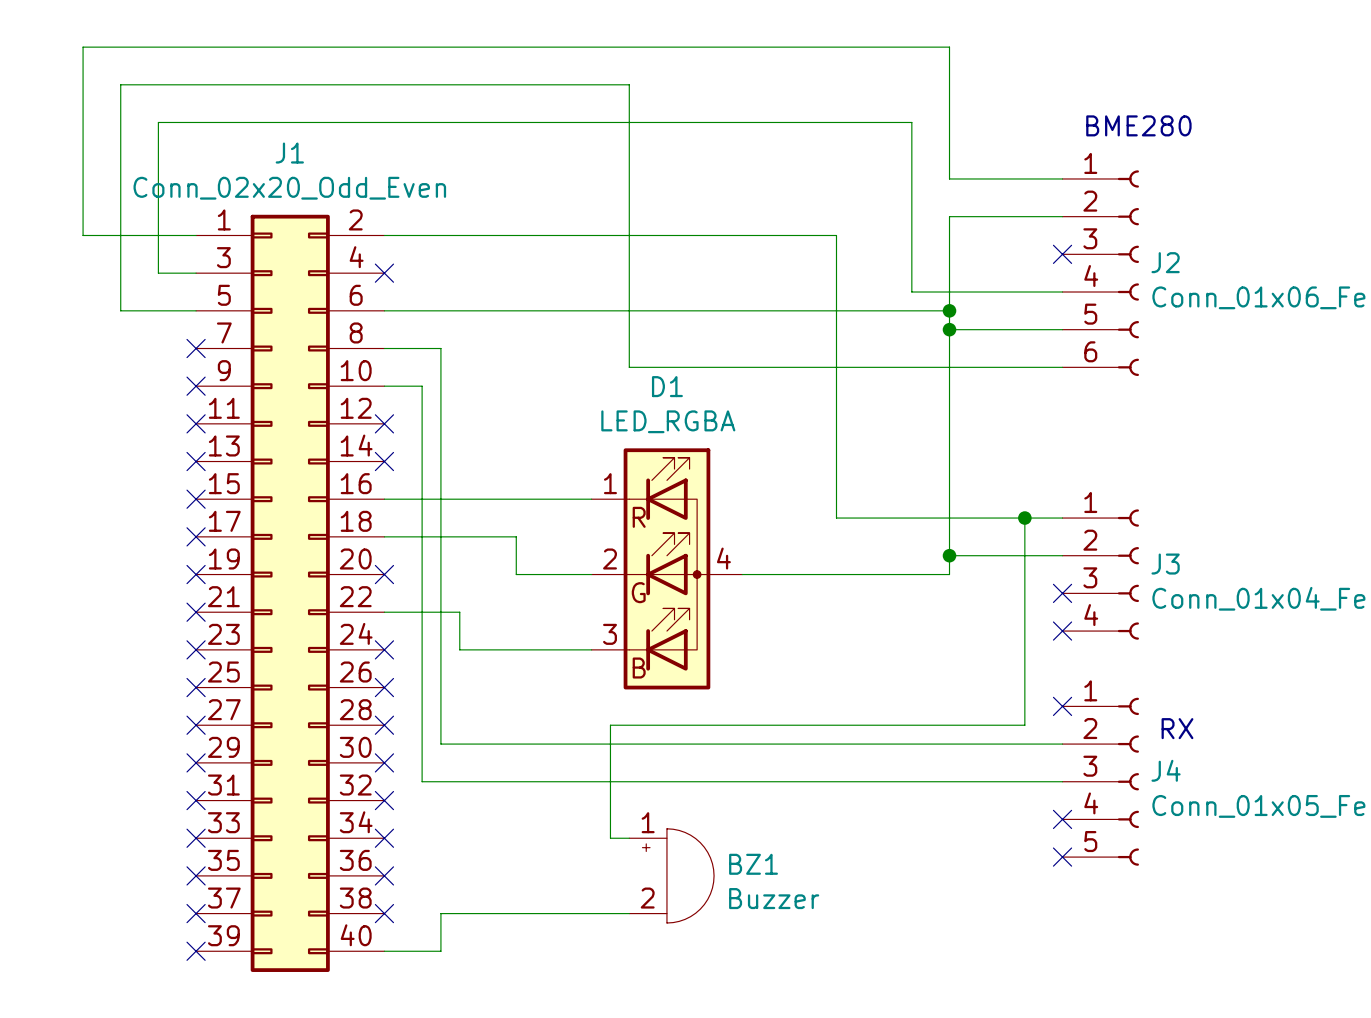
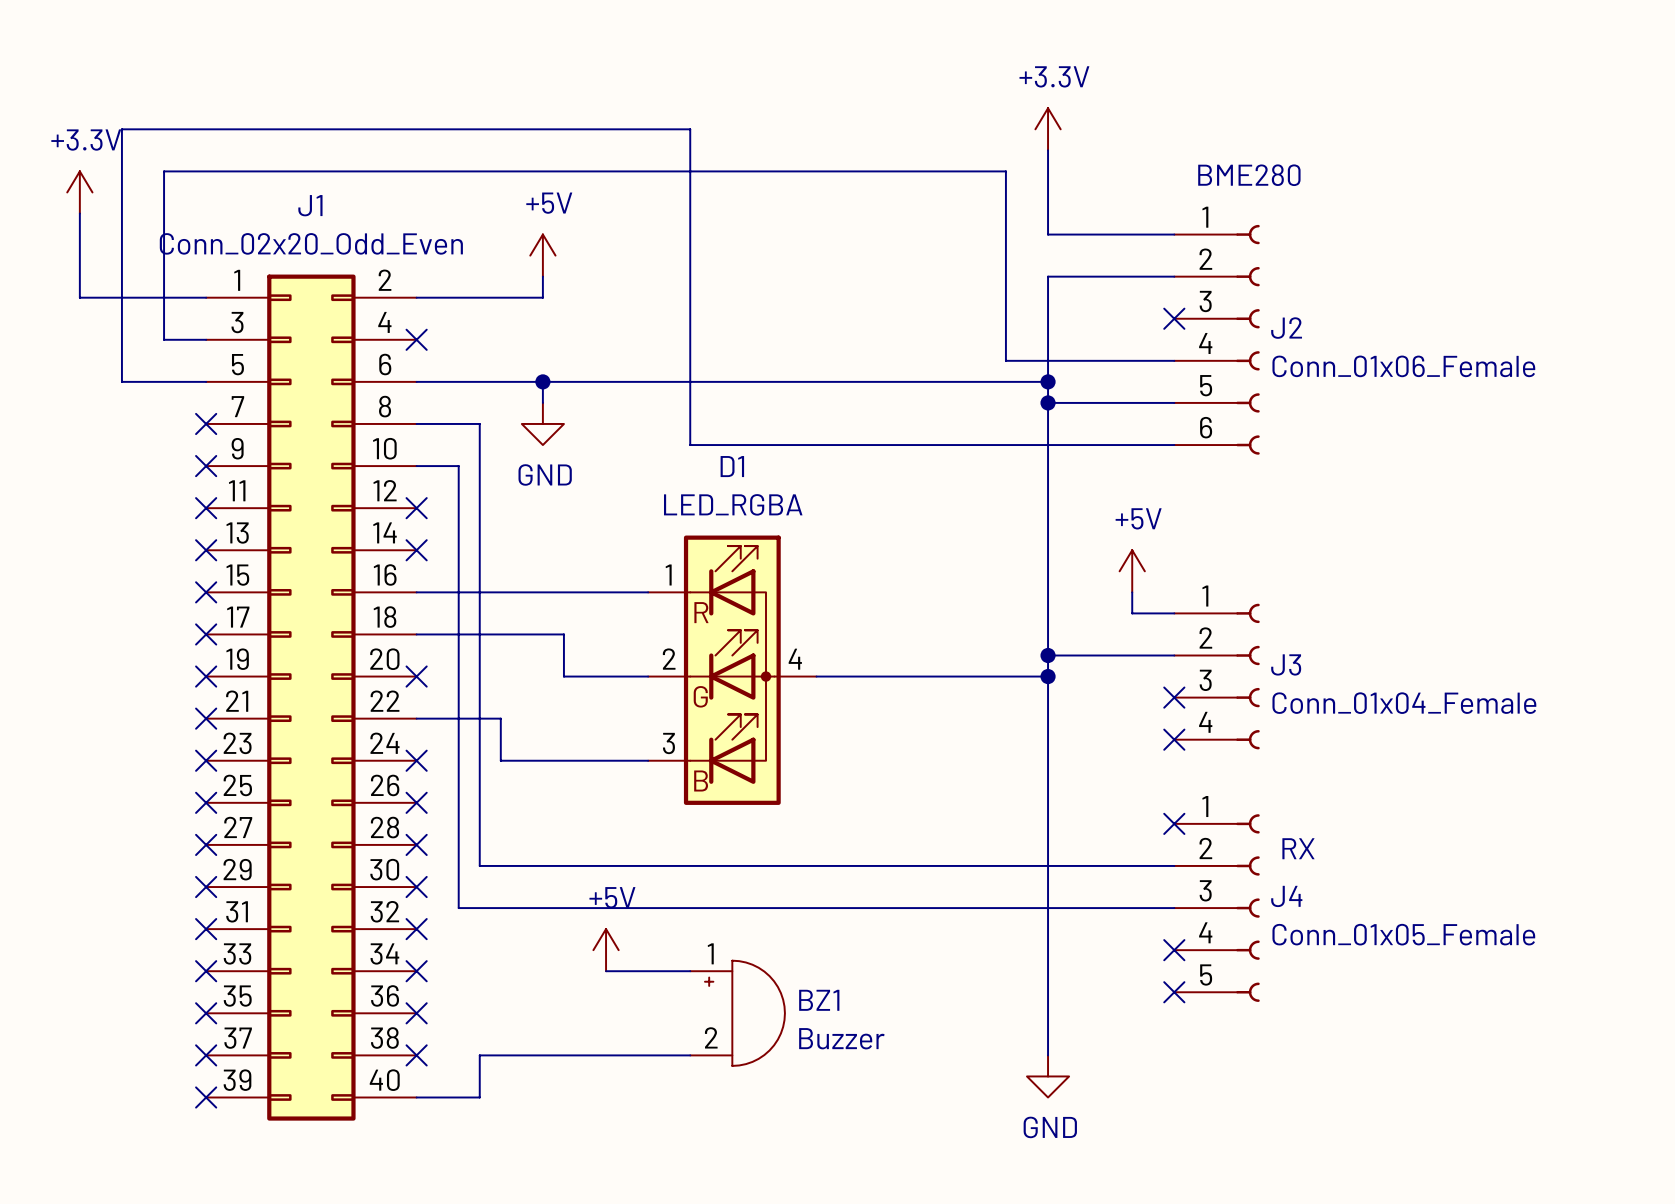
power symbol: none -> +3.3V (1048, 129)
wire: (949, 103) (949, 47) (83, 47) (83, 160) -> none
power symbol: none -> +3.3V (79, 192)
power symbol: none -> +5V (542, 255)
wire: none -> (542, 276) (542, 297)
wire: (497, 235) (836, 235) (836, 518) (1024, 518) (1024, 725) (610, 725) (610, 838) -> (606, 971) (669, 971)
wire: none -> (542, 381) (542, 402)
junction: none -> (542, 381)
power symbol: none -> GND (542, 423)
power symbol: none -> +5V (1132, 571)
wire: none -> (1132, 592) (1132, 613)
junction: (1024, 518) -> none
wire: none -> (1048, 676) (1048, 1055)
junction: none -> (1048, 676)
power symbol: none -> +5V (606, 950)
power symbol: none -> GND (1048, 1076)

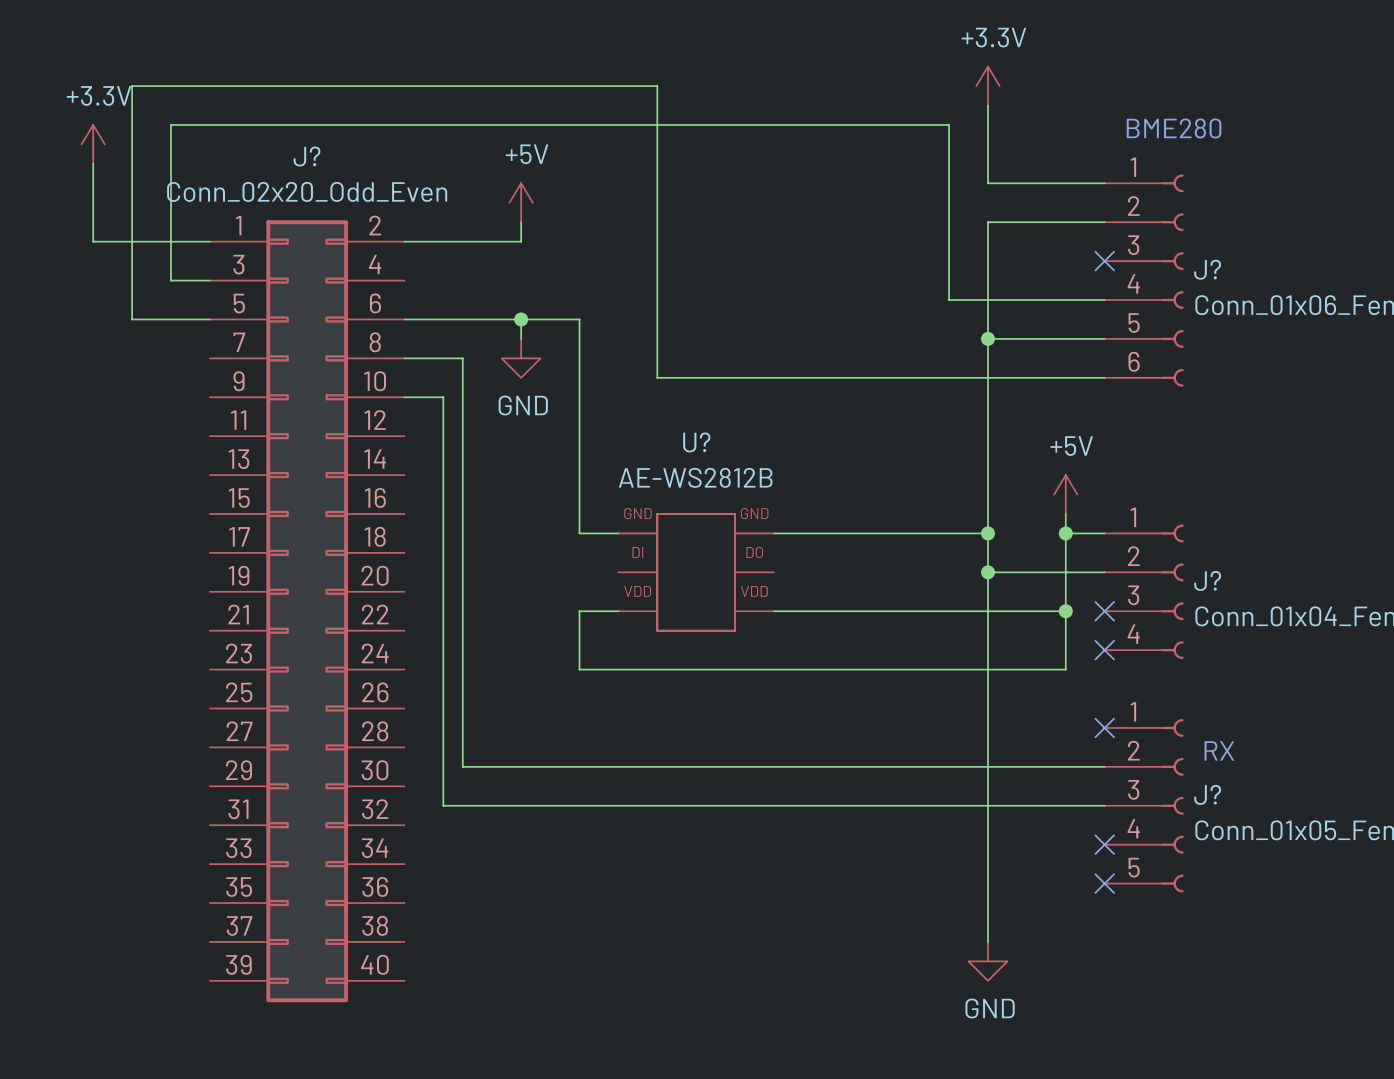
J1 name: J1 (310, 205) -> J? (306, 156)
J2 name: J2 (1286, 328) -> J? (1207, 269)
no-connect mark: (416, 339) -> none
wire: (606, 381) (1048, 381) -> (579, 319) (579, 533) (618, 533)
junction: (1048, 381) -> none
no-connect mark: (206, 423) -> none
no-connect mark: (206, 466) -> none
no-connect mark: (206, 508) -> none
no-connect mark: (416, 508) -> none
no-connect mark: (206, 550) -> none
no-connect mark: (416, 550) -> none
no-connect mark: (206, 592) -> none
wire: (416, 592) (648, 592) -> none
junction: none -> (987, 533)
wire: none -> (1065, 533) (1065, 669) (618, 669)
junction: none -> (1065, 533)
no-connect mark: (206, 634) -> none
wire: (416, 634) (563, 634) (563, 676) (648, 676) -> none
U?: none -> AE-WS2812B (696, 572)
J3 name: J3 (1286, 664) -> J? (1207, 580)
D1: LED_RGBA (732, 670) -> none
no-connect mark: (206, 676) -> none
no-connect mark: (416, 676) -> none
wire: (816, 676) (1048, 676) -> (774, 533) (987, 533)
junction: (1048, 676) -> none
wire: none -> (774, 611) (1065, 611)
junction: none -> (1065, 611)
no-connect mark: (206, 718) -> none
wire: (416, 718) (500, 718) (500, 760) (606, 760) -> (618, 611) (579, 611) (579, 669)
no-connect mark: (206, 760) -> none
no-connect mark: (416, 760) -> none
no-connect mark: (206, 802) -> none
no-connect mark: (416, 802) -> none
no-connect mark: (206, 844) -> none
no-connect mark: (416, 844) -> none
no-connect mark: (206, 887) -> none
no-connect mark: (416, 887) -> none
J4 name: J4 (1286, 896) -> J? (1207, 794)
no-connect mark: (206, 929) -> none
no-connect mark: (416, 929) -> none
power symbol: +5V (606, 950) -> none
no-connect mark: (206, 971) -> none
no-connect mark: (416, 971) -> none
wire: (606, 971) (690, 971) -> none
no-connect mark: (206, 1013) -> none
no-connect mark: (416, 1013) -> none
BZ1: Buzzer (737, 1013) -> none
no-connect mark: (206, 1055) -> none
no-connect mark: (416, 1055) -> none
wire: (690, 1055) (479, 1055) (479, 1097) (416, 1097) -> none
no-connect mark: (206, 1097) -> none

